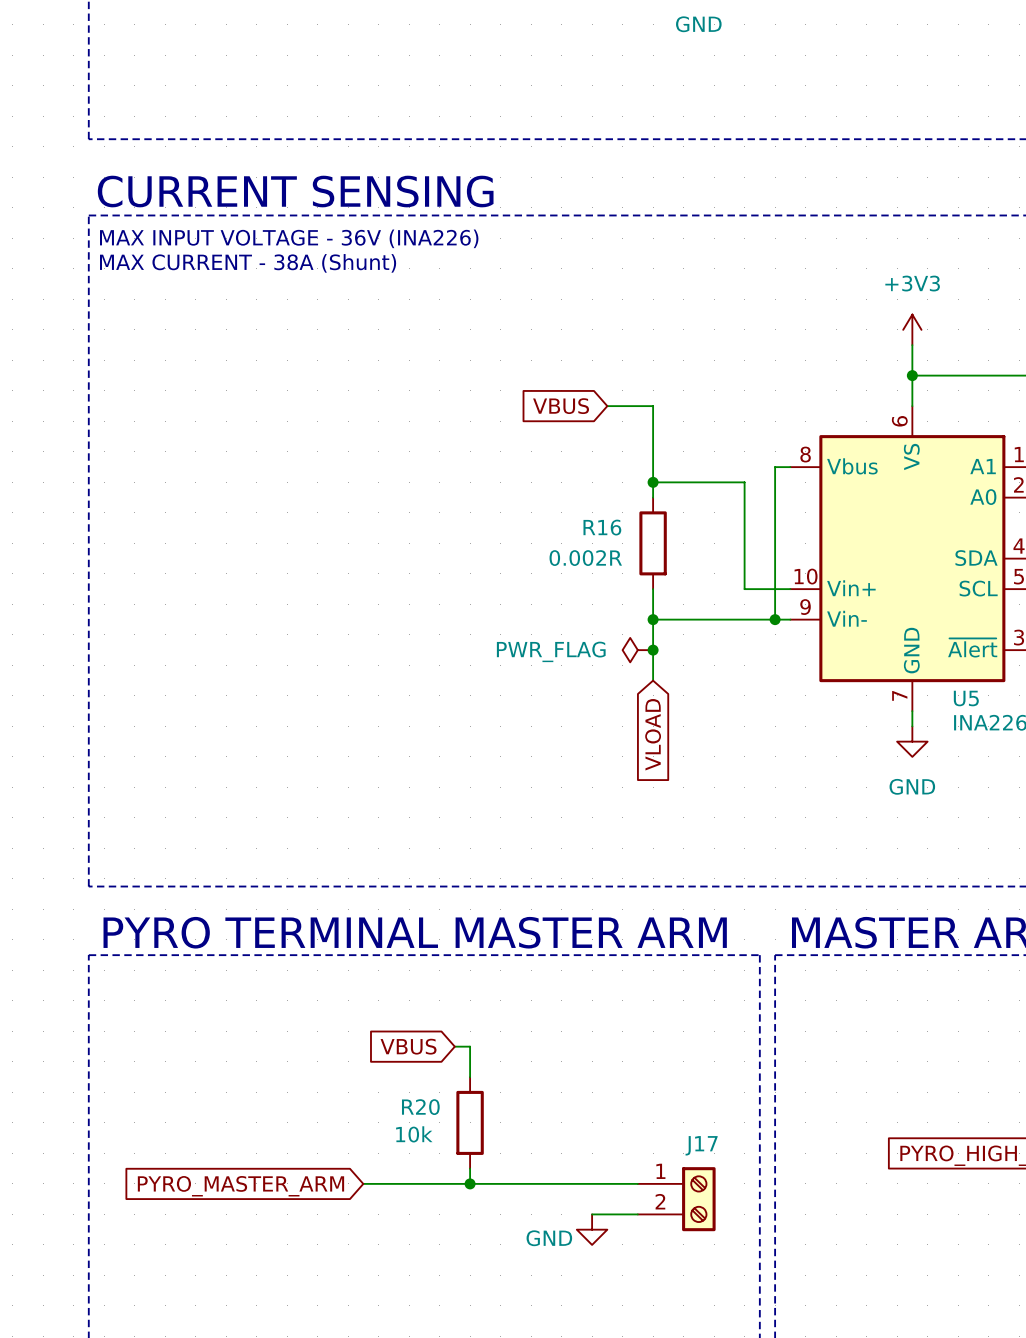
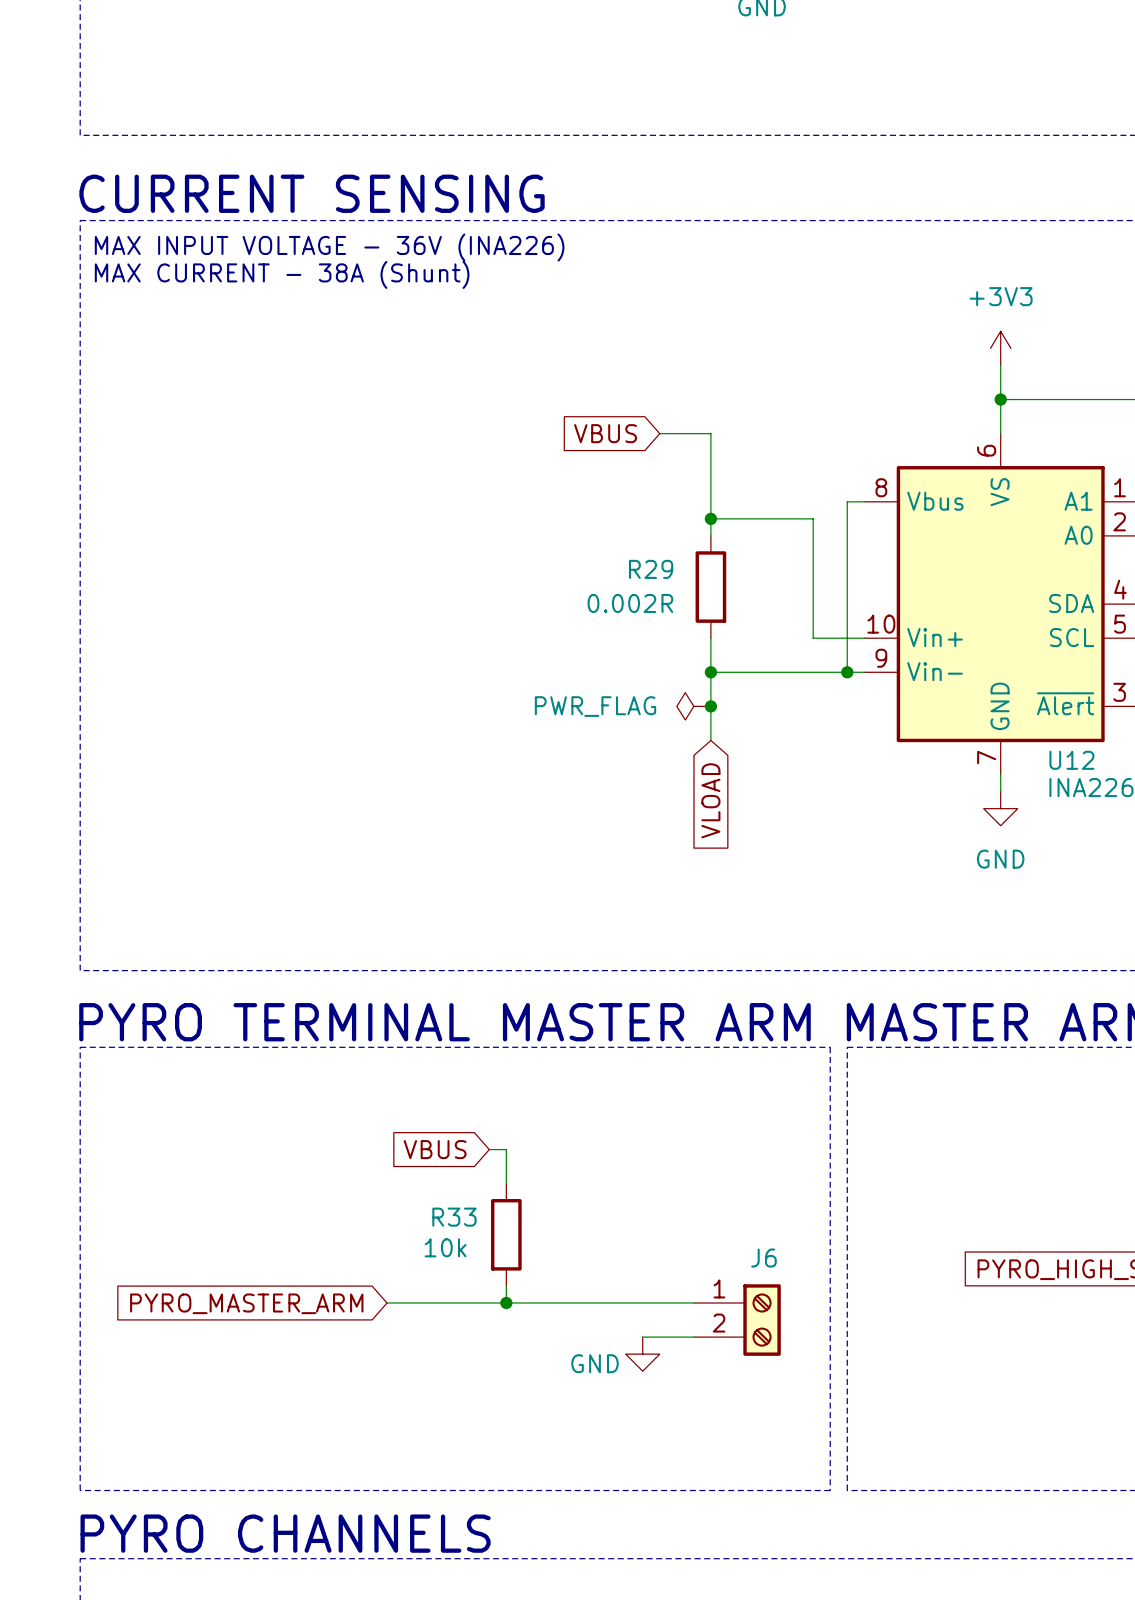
R16 name: R16 (602, 527) -> R29 (651, 569)
U5 name: U5 (966, 698) -> U12 (1071, 760)
R20 name: R20 (420, 1107) -> R33 (454, 1217)
J17 name: J17 (701, 1145) -> J6 (763, 1258)

